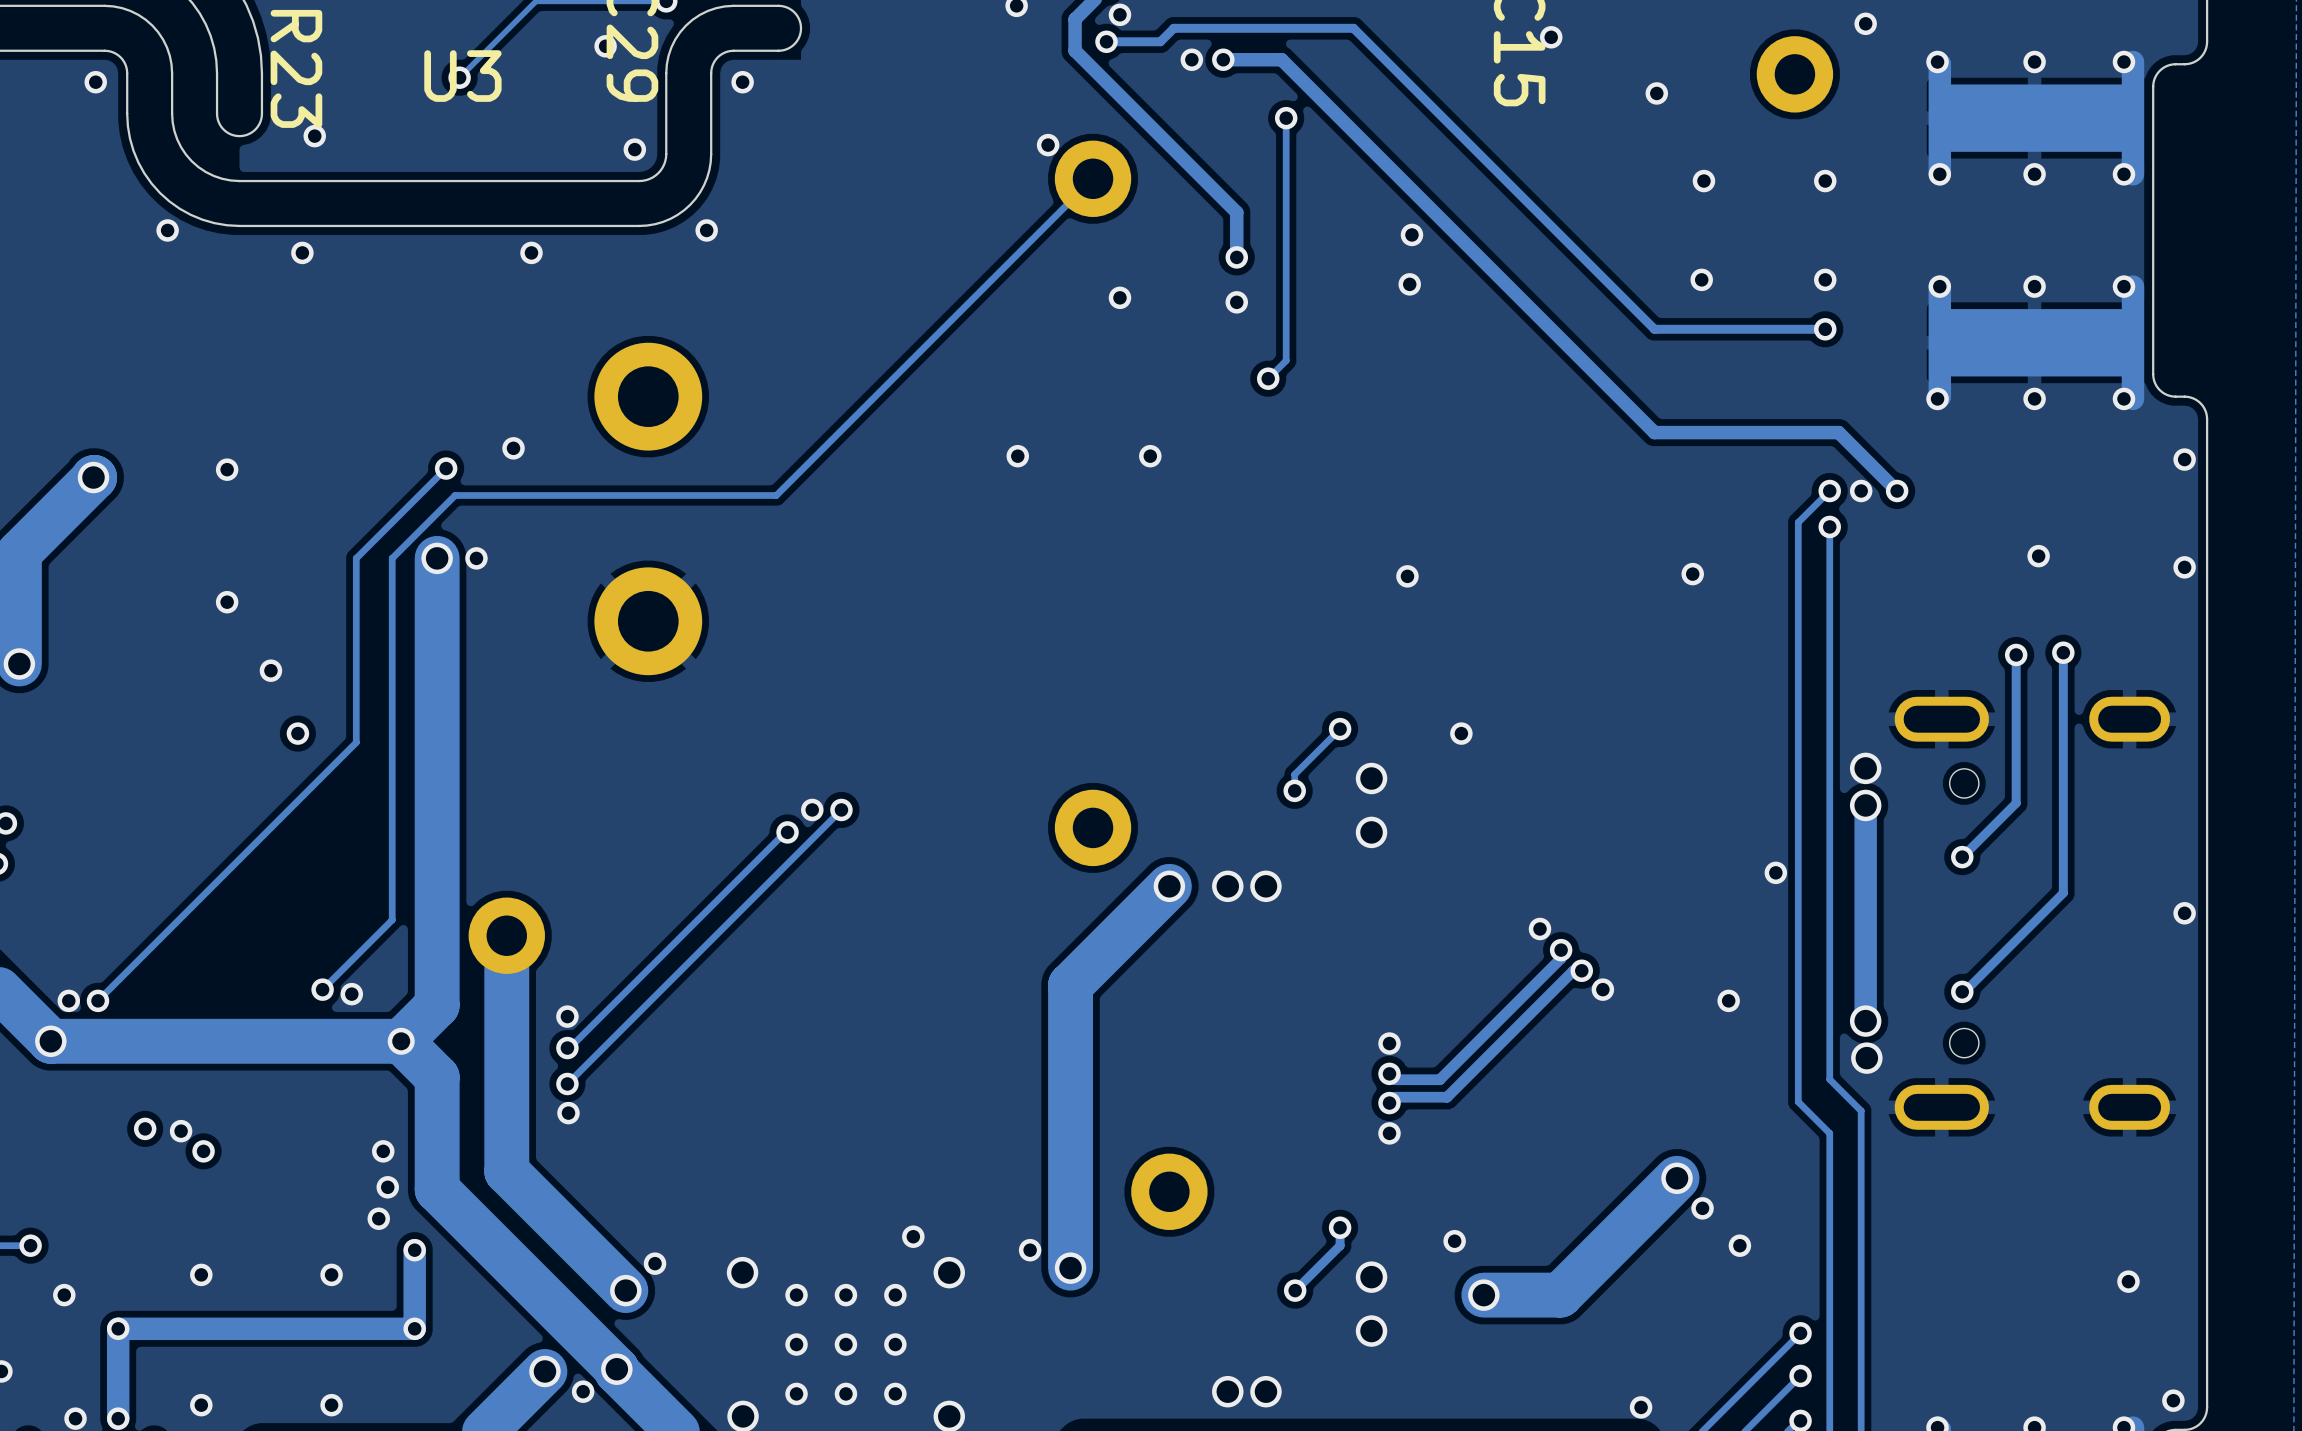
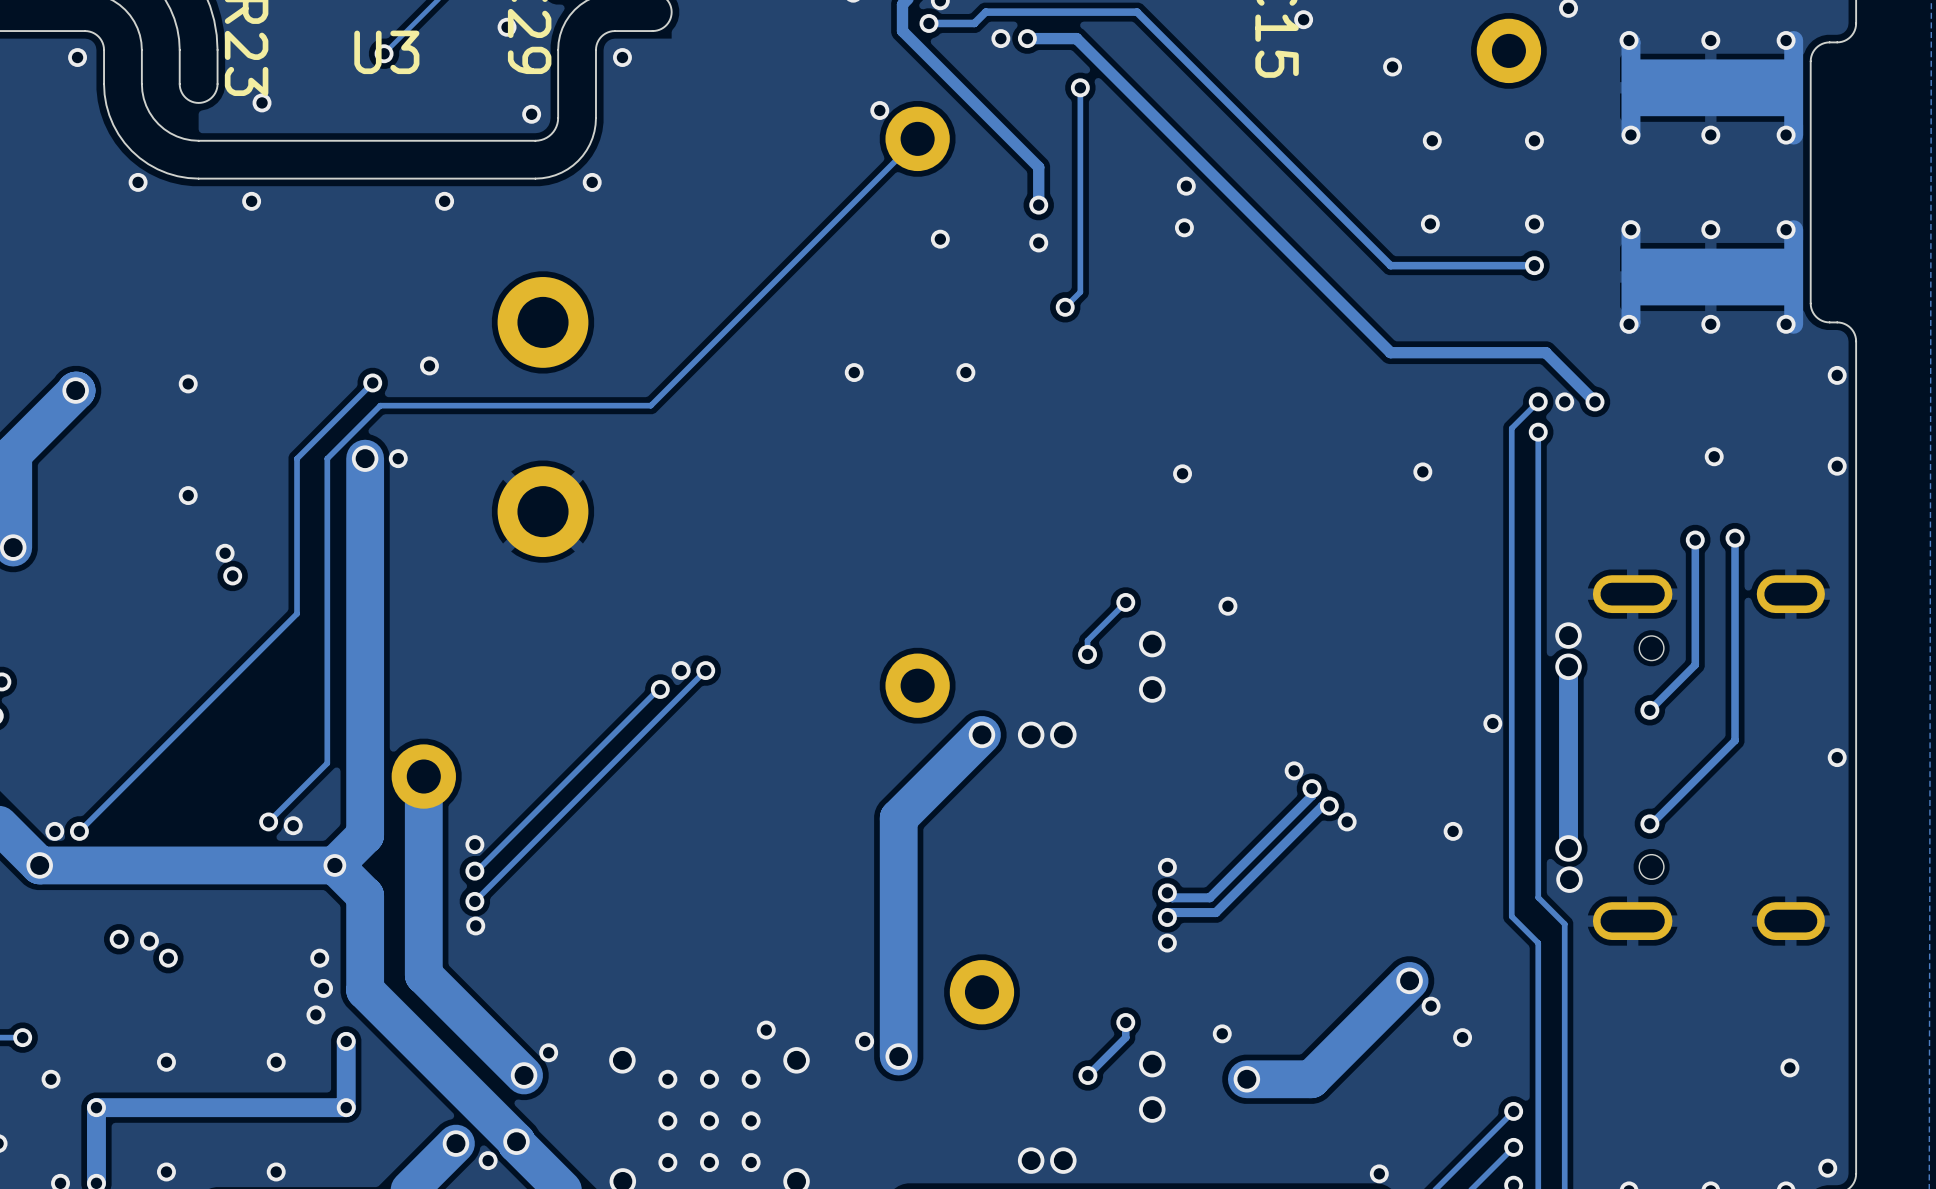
via position: (297, 733) -> (232, 575)

